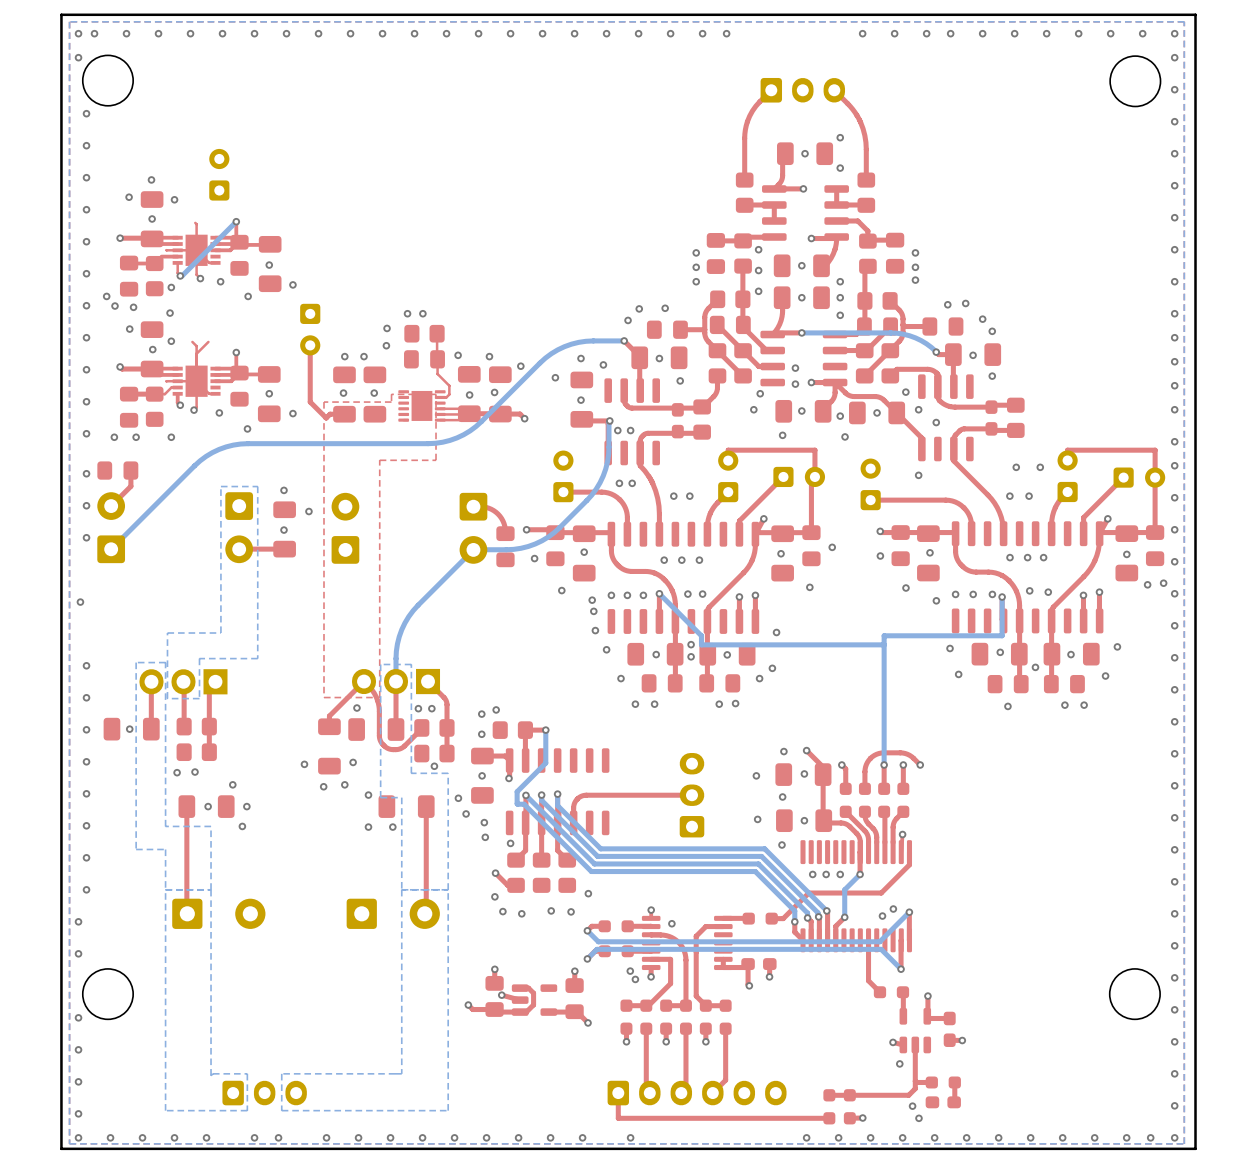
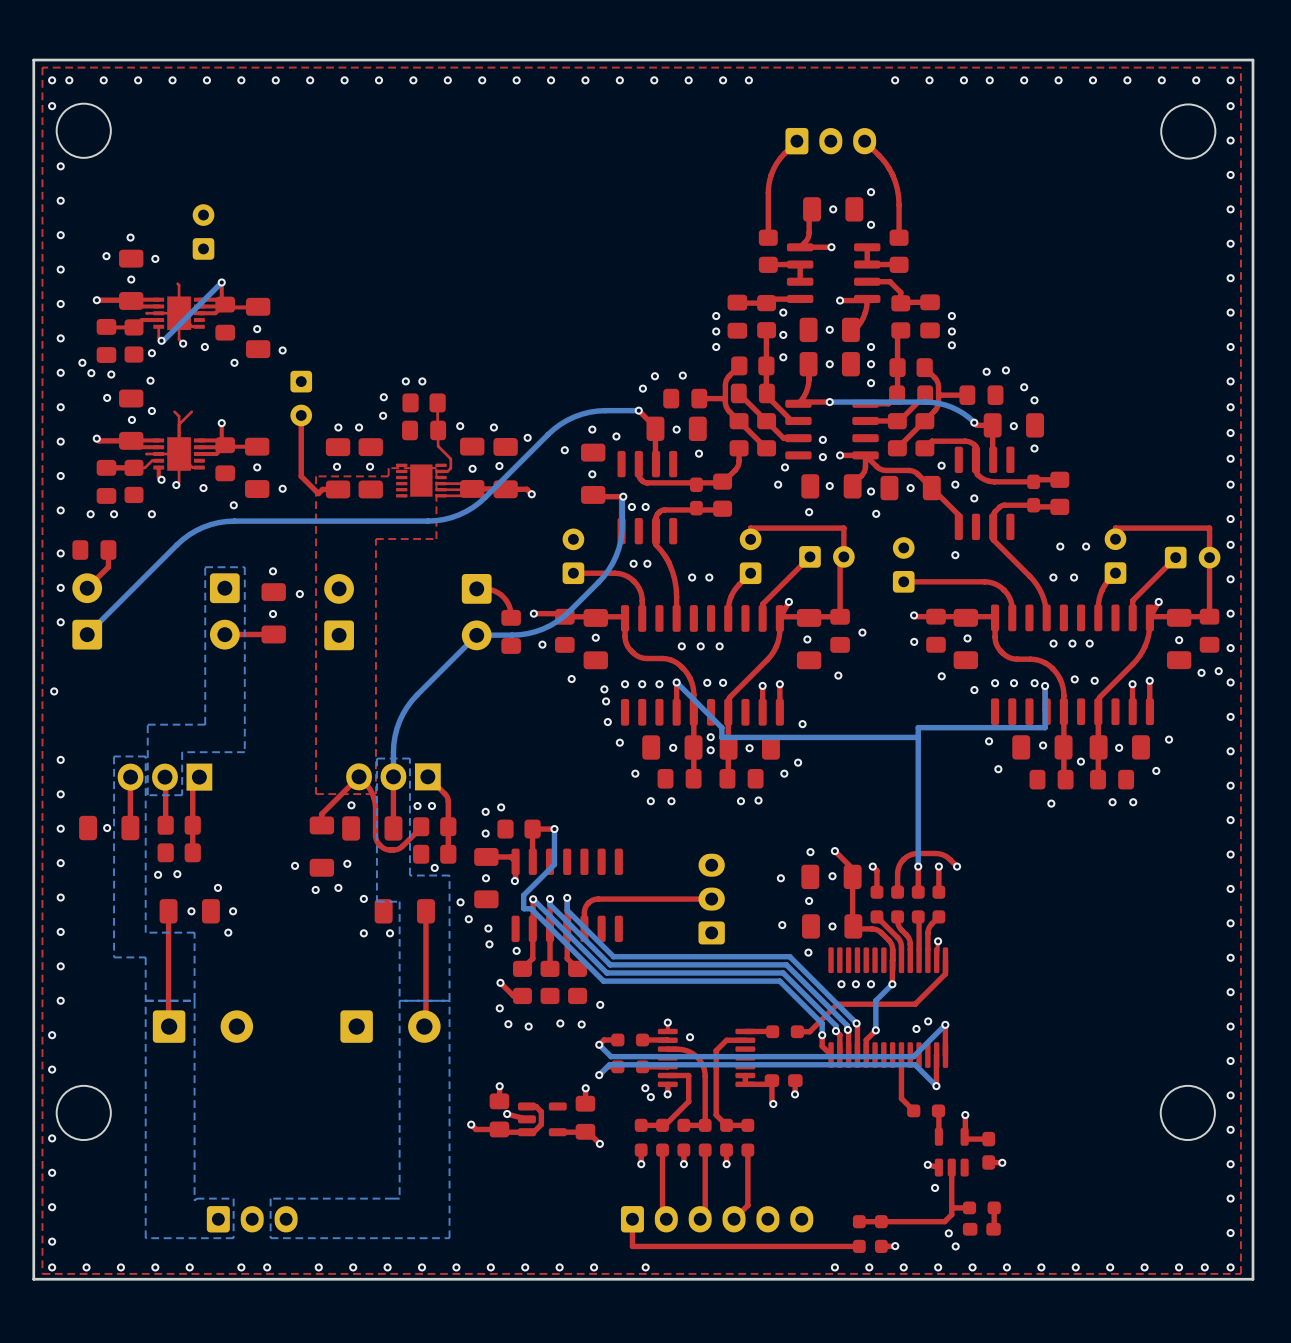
bottom zone outline: (1184, 21) (1184, 1143) (69, 1143) (69, 21) (1184, 21) -> none

